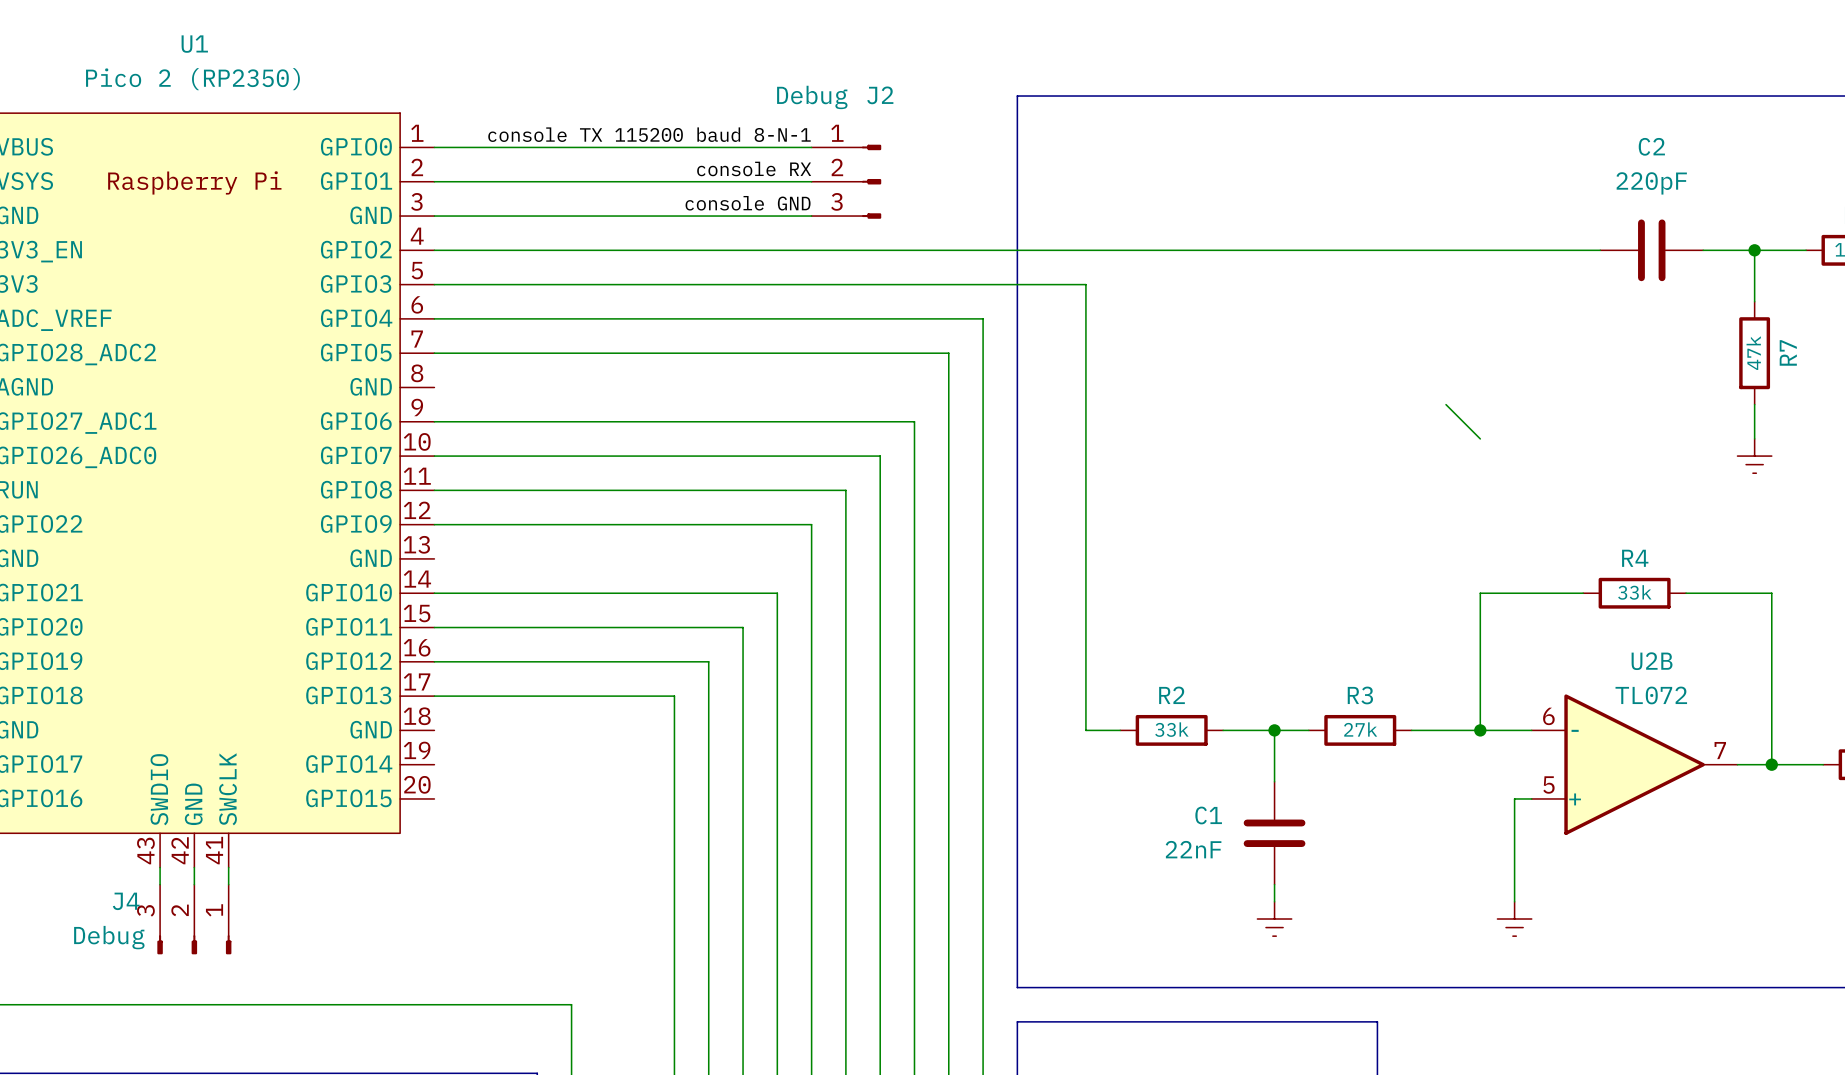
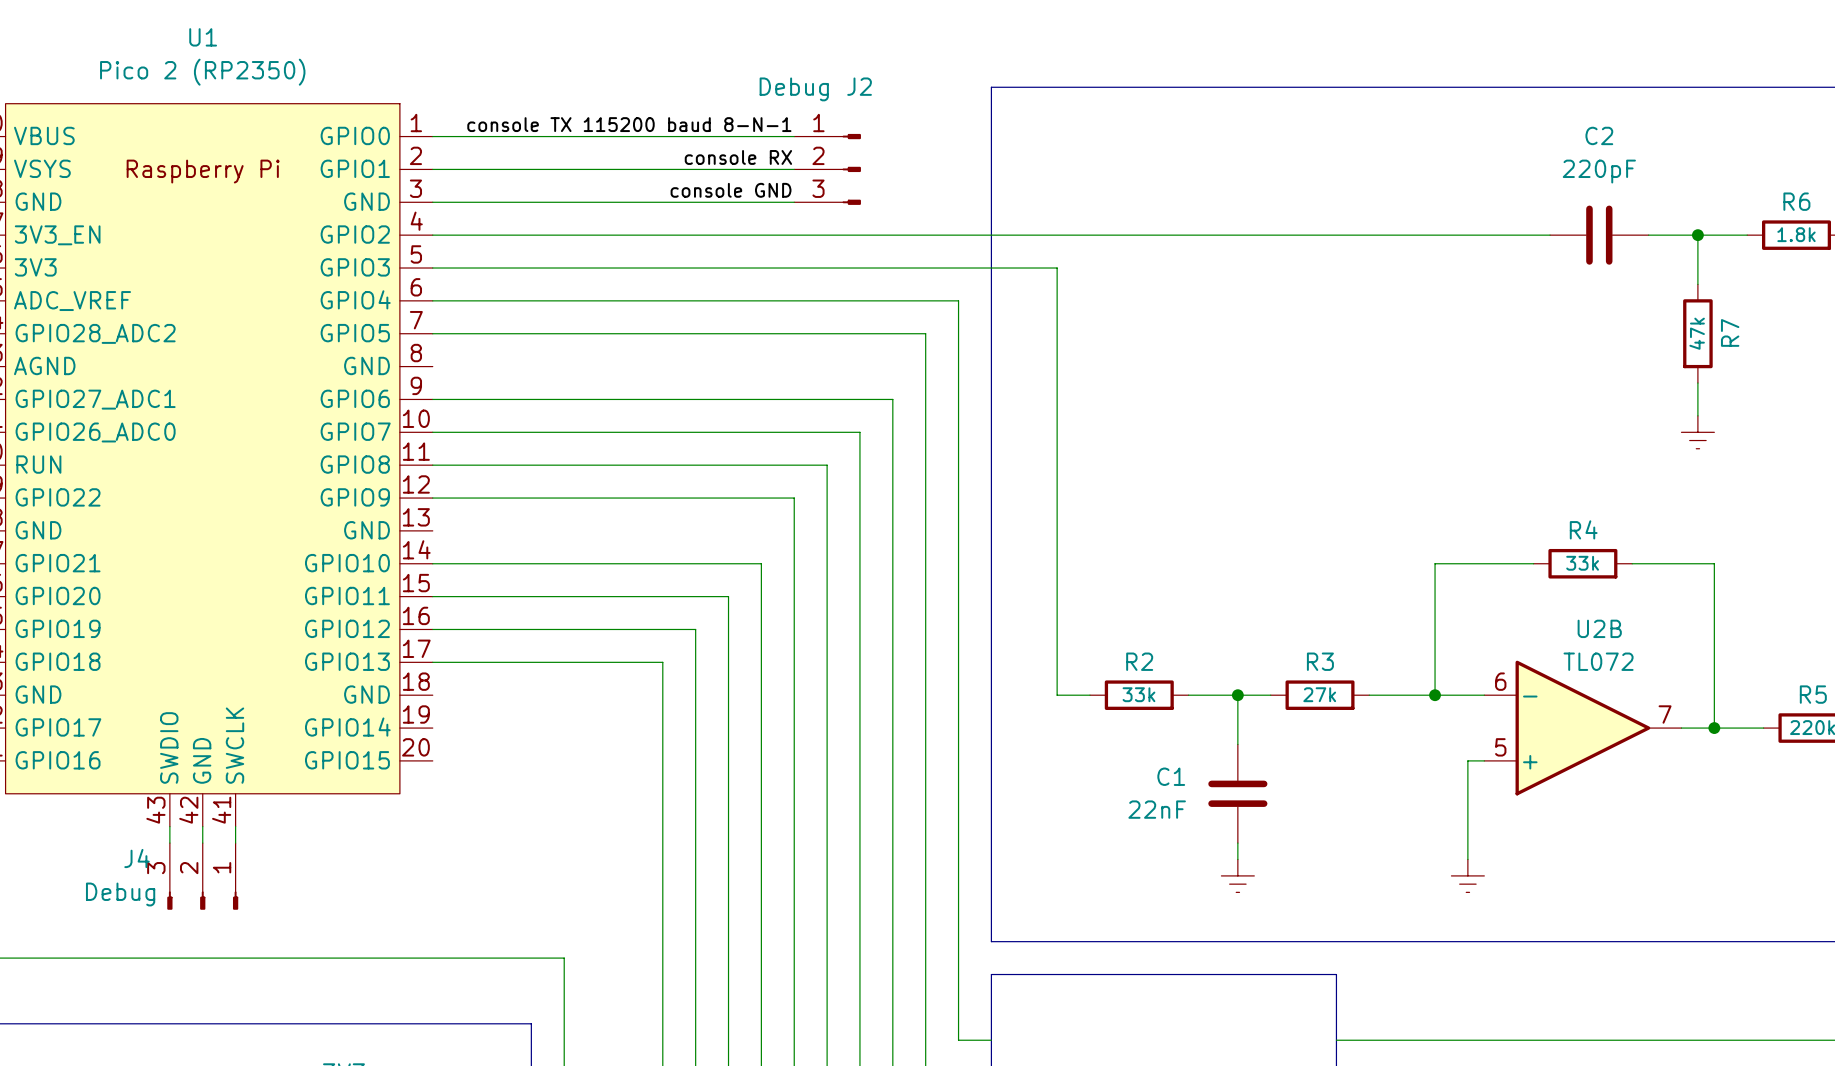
wire: (1446, 404) (1480, 438) -> none

